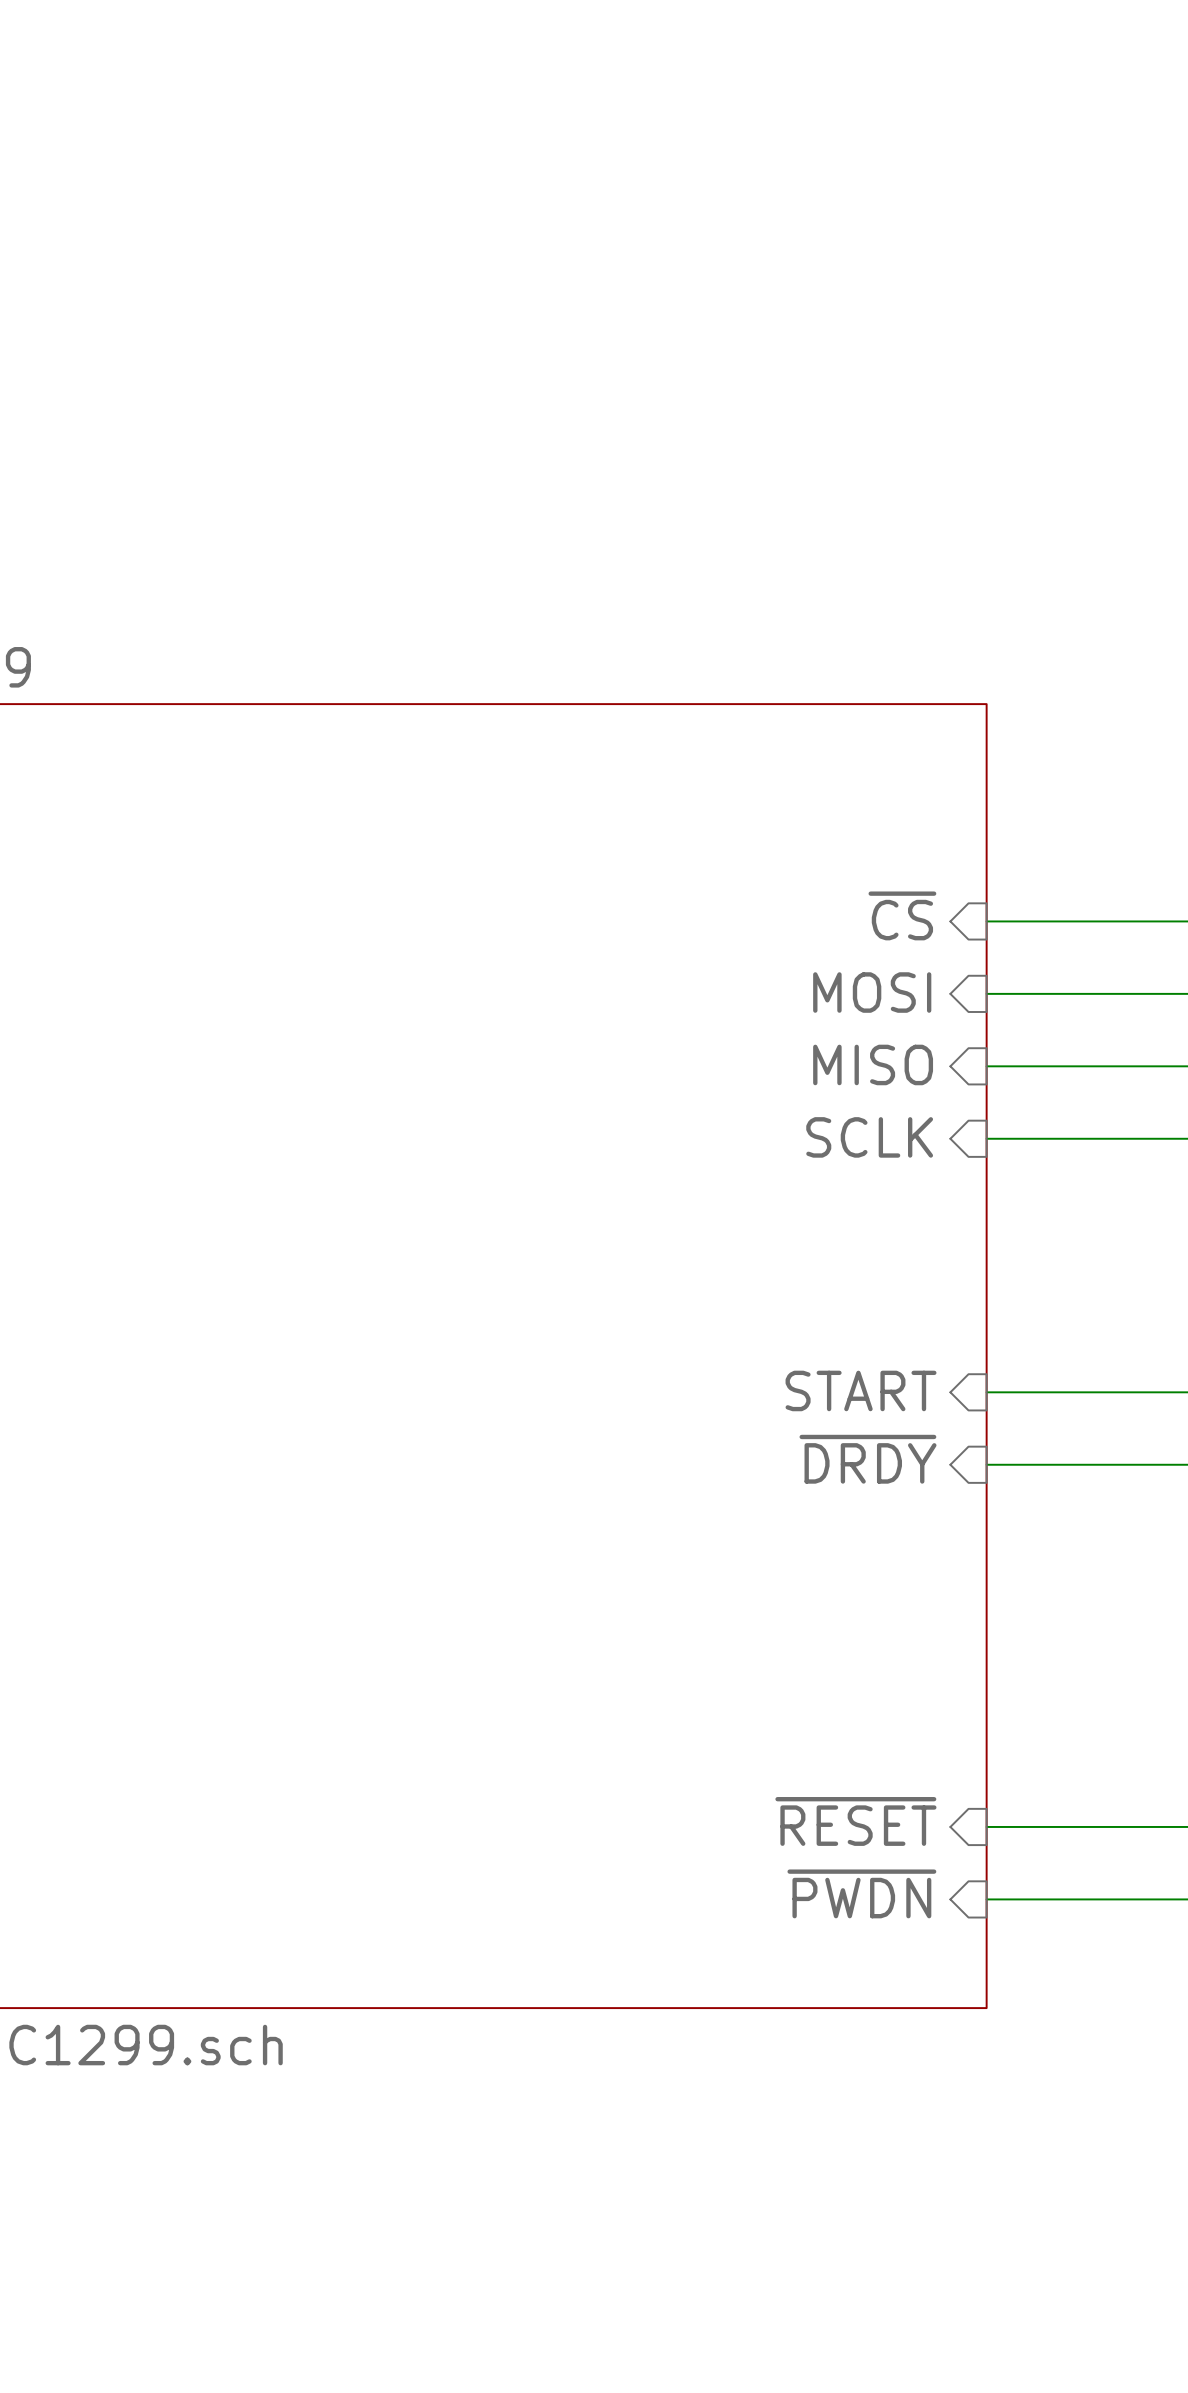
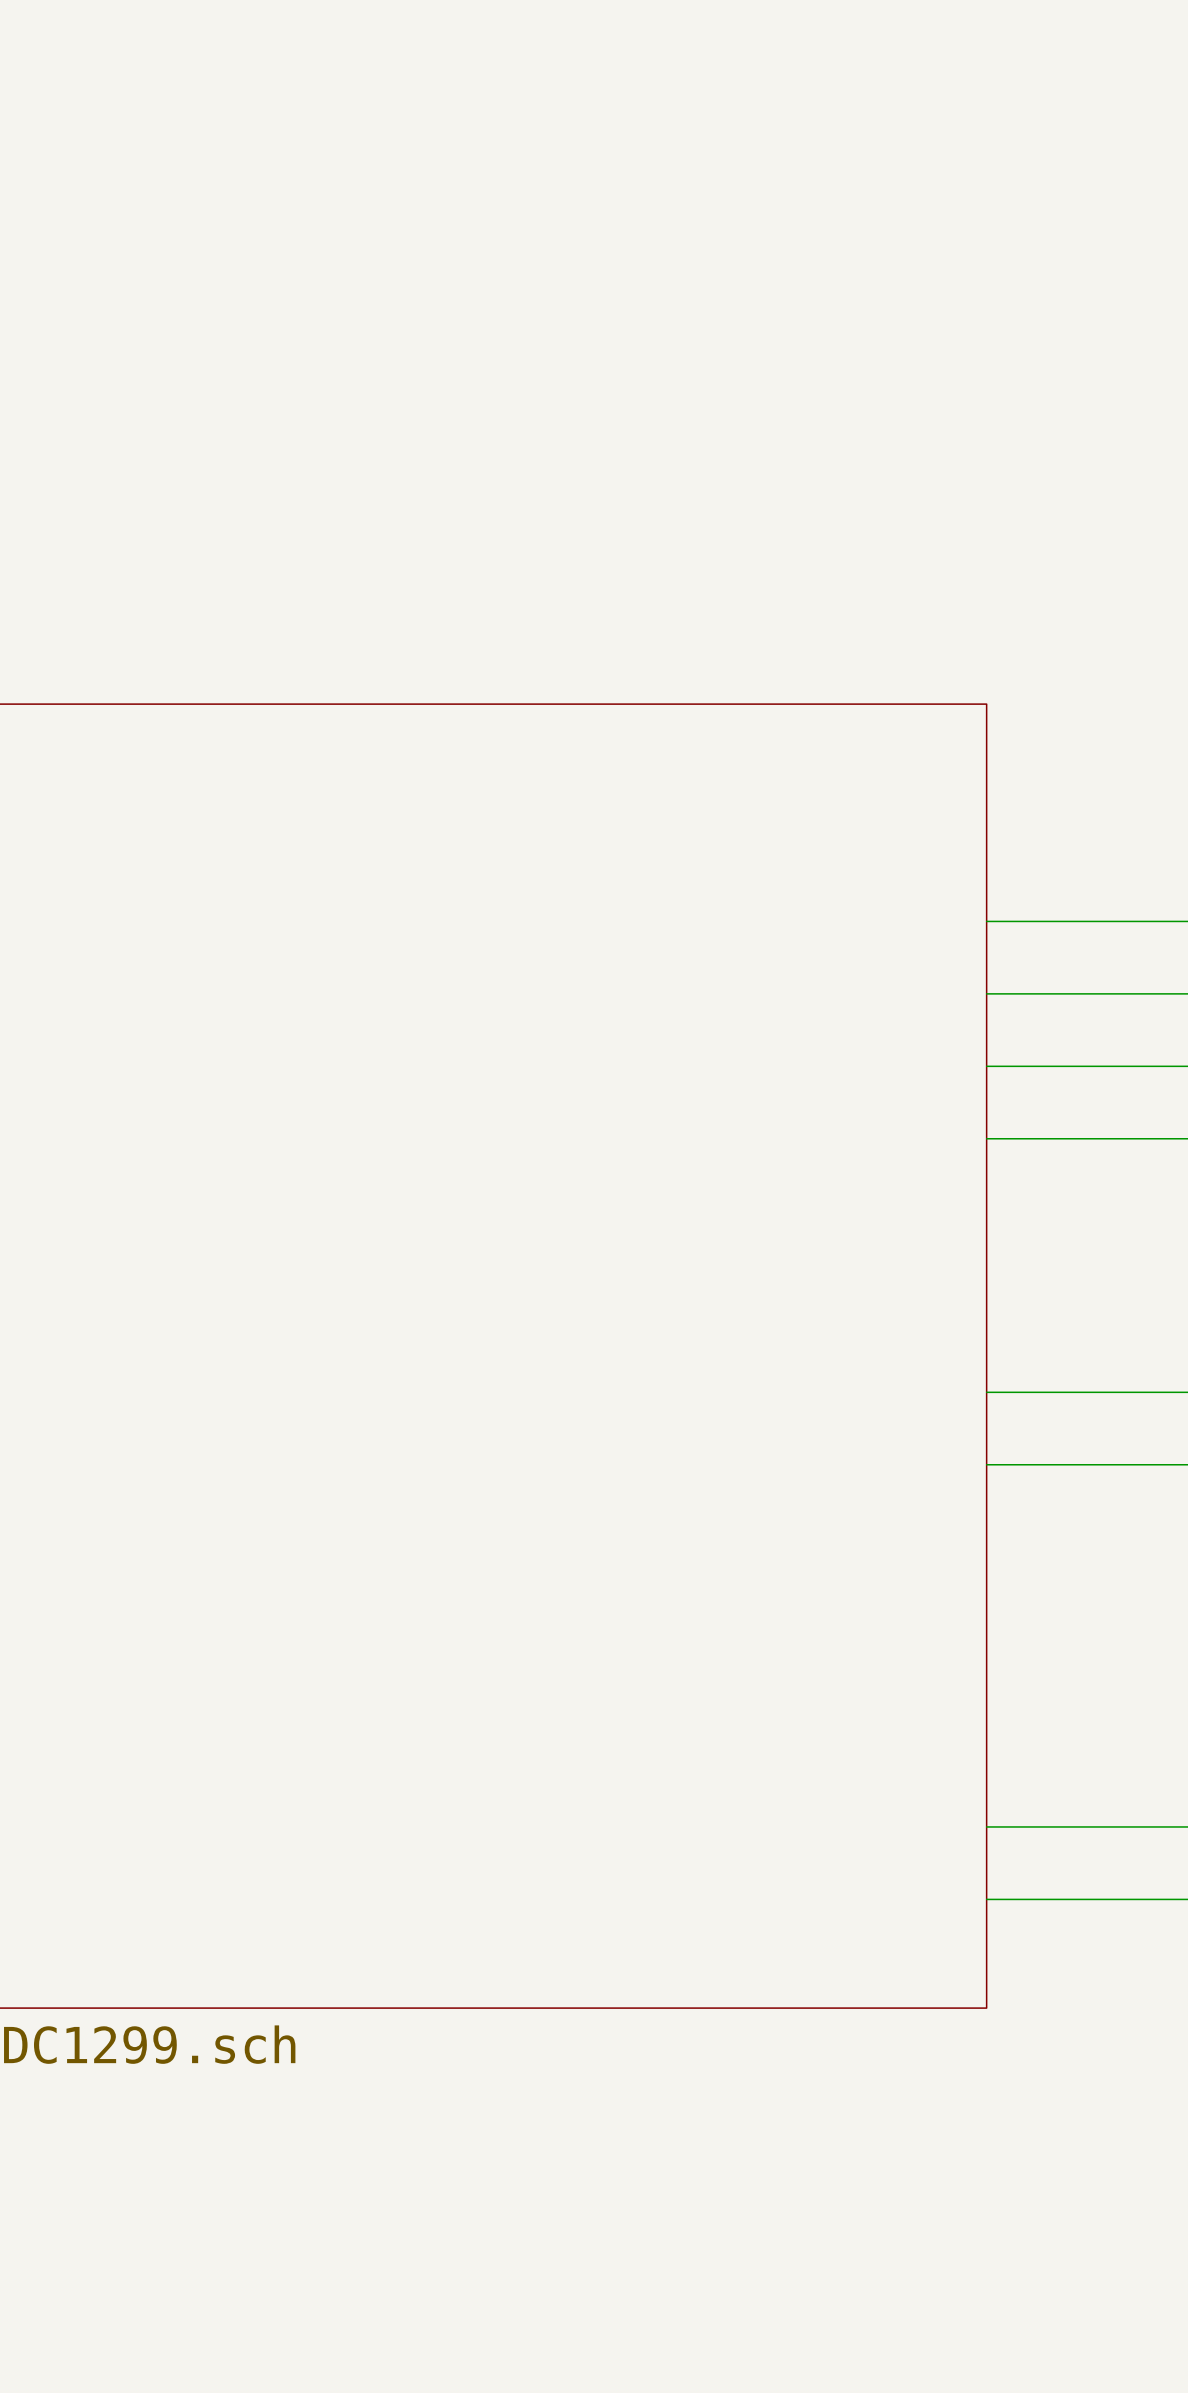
sheet pin: ~{CS} (902, 915) -> none
sheet pin: MOSI (872, 992) -> none
sheet pin: MISO (873, 1064) -> none
sheet pin: SCLK (869, 1137) -> none
sheet pin: START (861, 1390) -> none
sheet pin: ~{DRDY} (868, 1459) -> none
sheet pin: ~{RESET} (855, 1821) -> none
sheet pin: ~{PWDN} (861, 1893) -> none

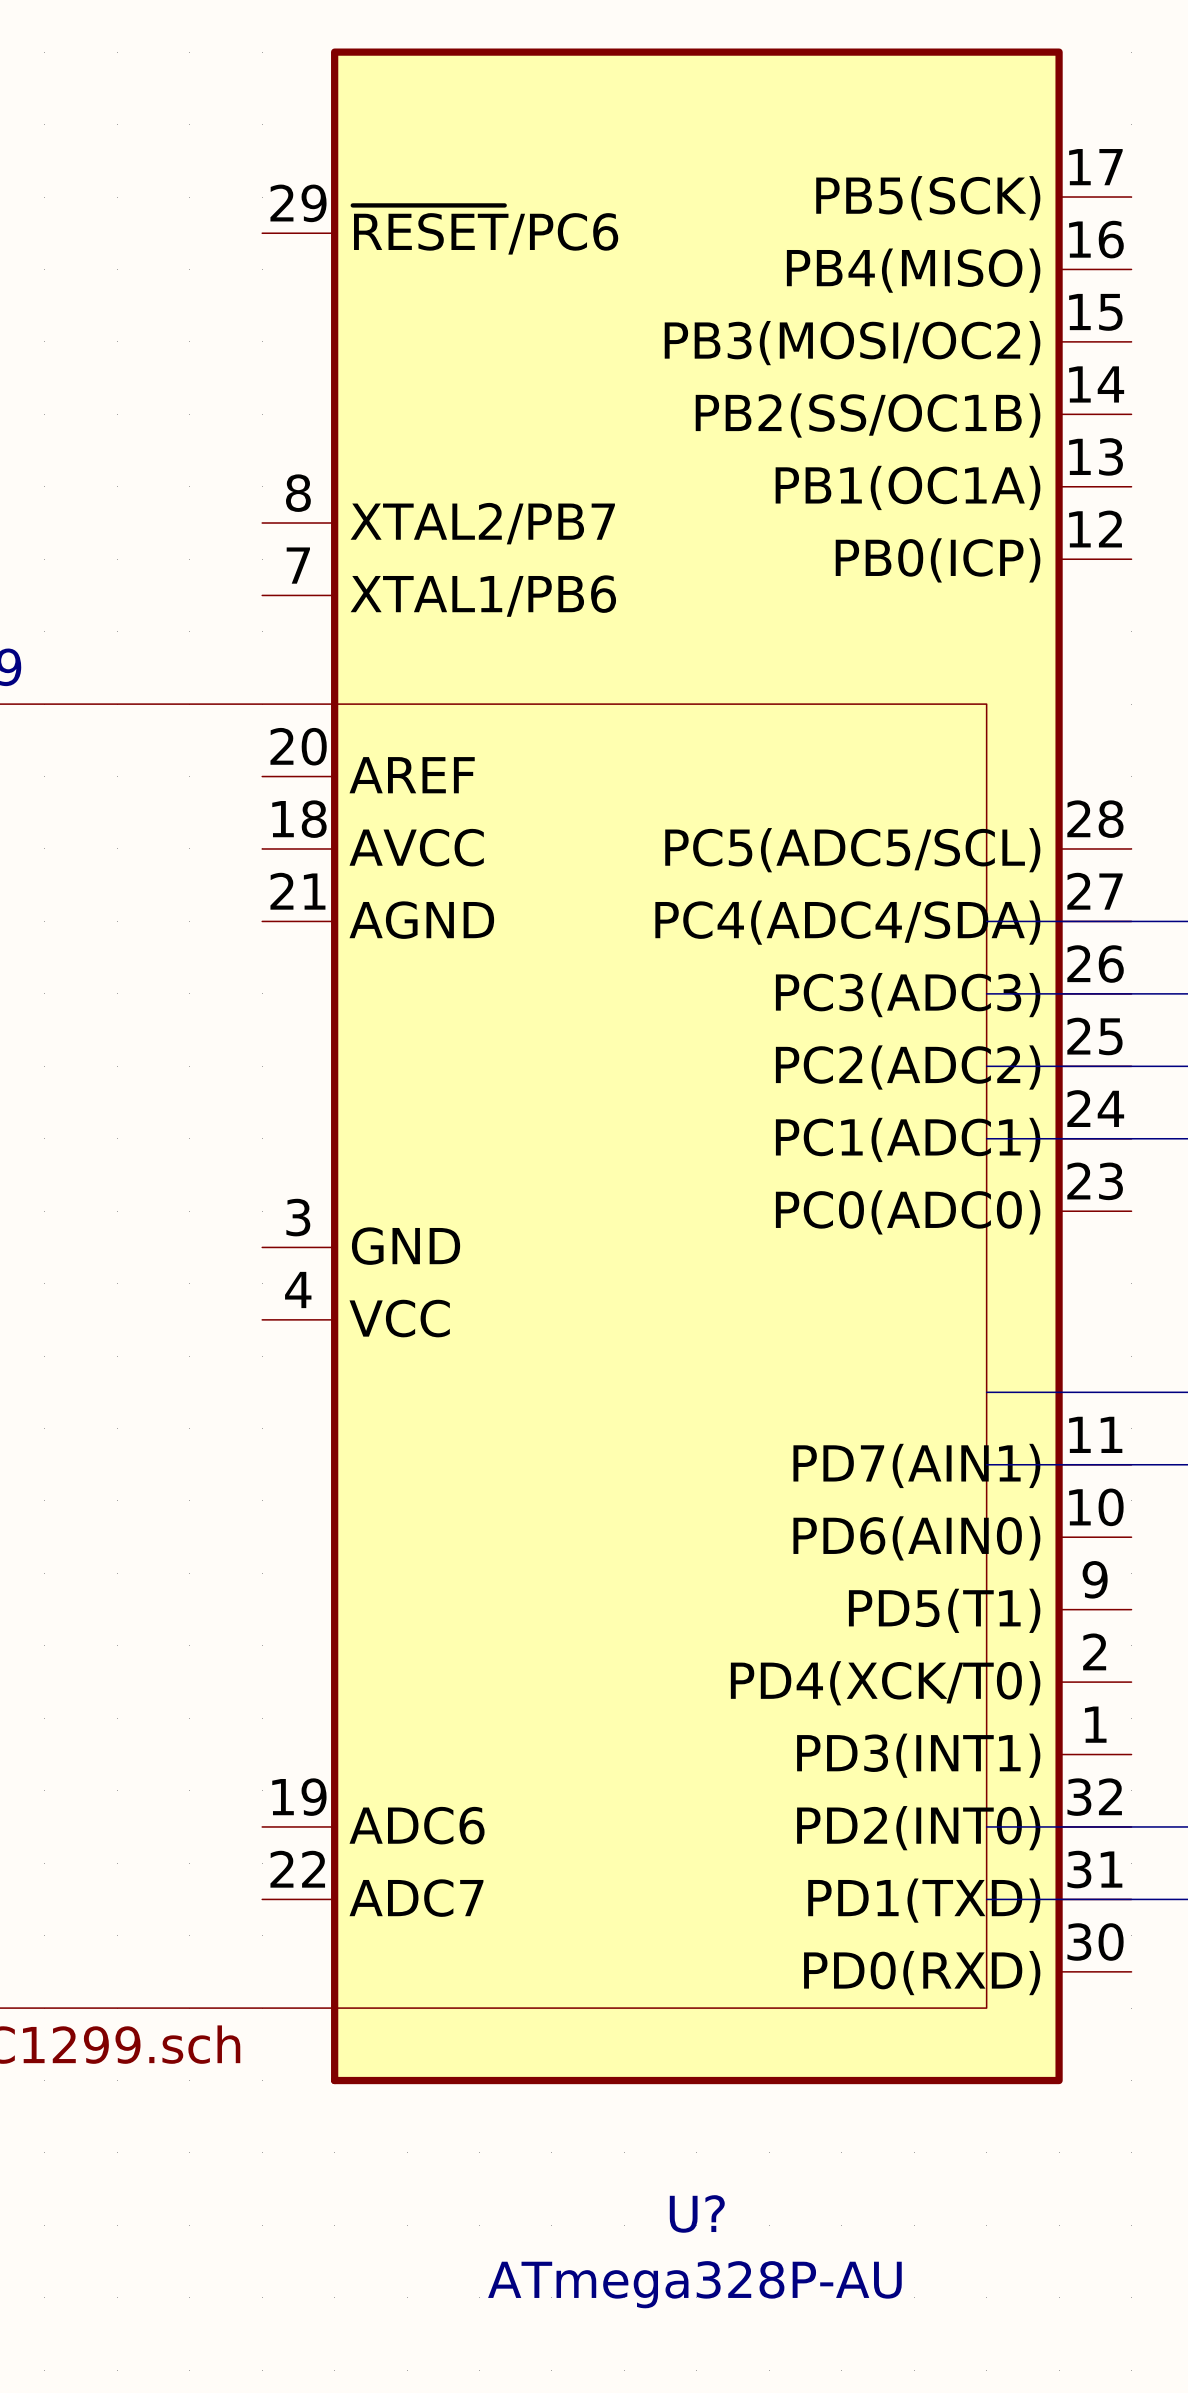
U?: none -> ATmega328P-AU (696, 1066)

